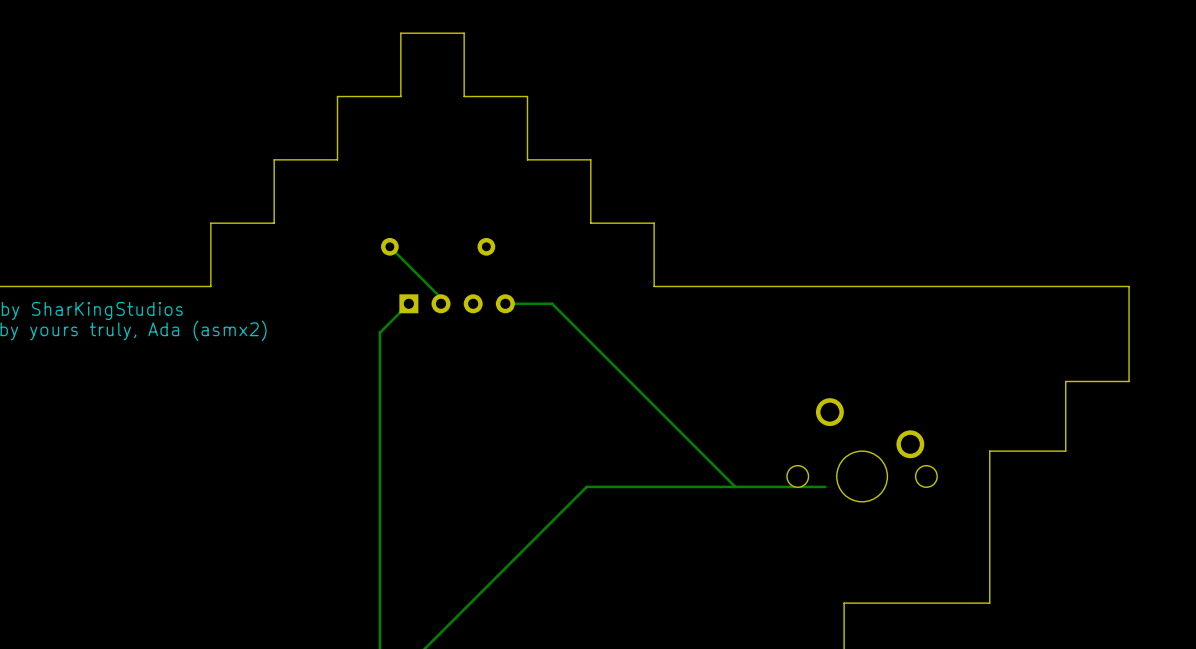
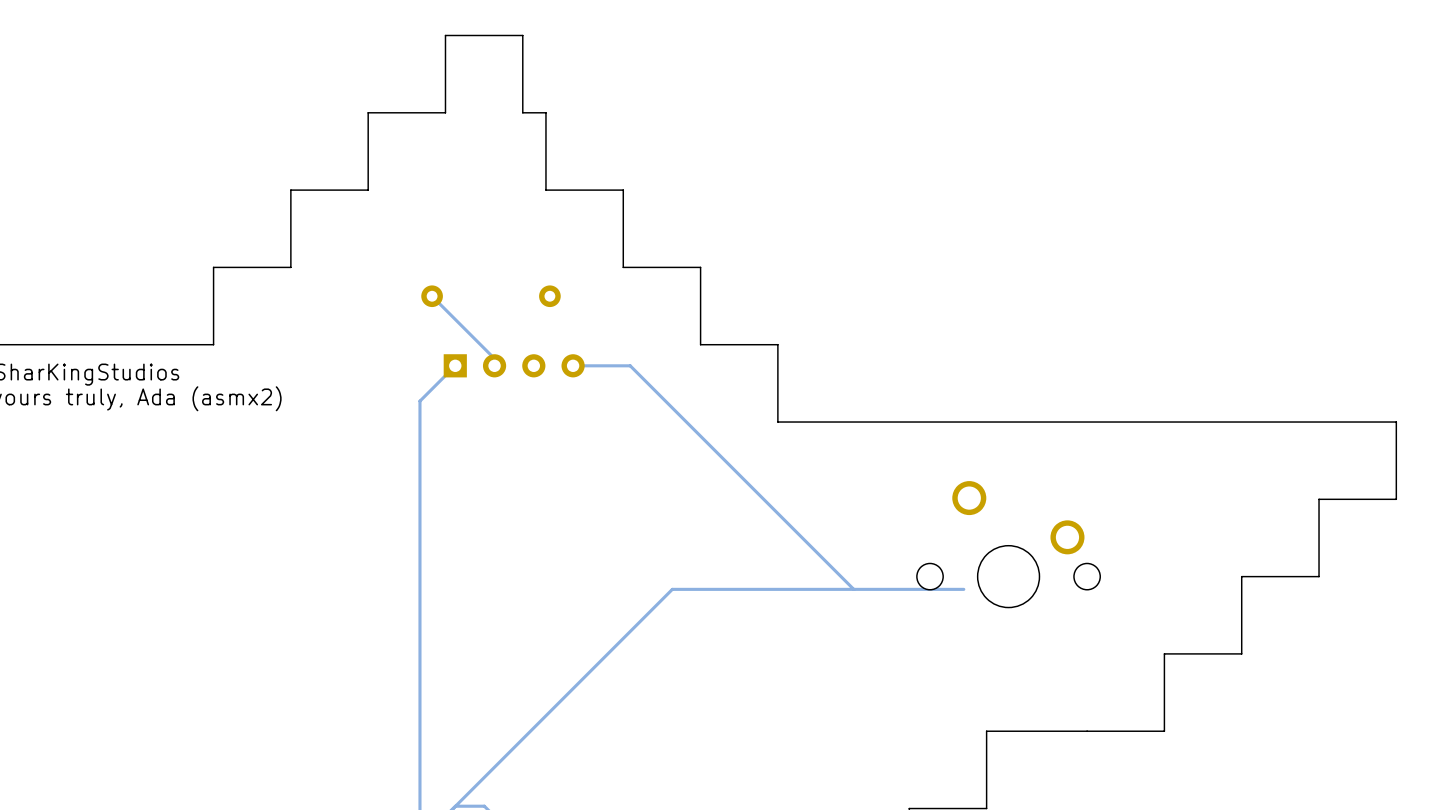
board edge: (483, 96) (527, 96) (527, 159) -> (545, 112) (545, 190) (600, 190)
board edge: (546, 159) (590, 159) (590, 223) -> (623, 190) (623, 267) (677, 267)
board edge: (609, 223) (654, 223) (654, 286) -> (700, 267) (700, 344) (754, 344)
board edge: (673, 286) (1129, 286) (1129, 381) (1065, 381) (1065, 451) (989, 451) (989, 539) -> (777, 344) (777, 422) (1396, 422) (1396, 499) (1319, 499) (1319, 576) (1241, 576) (1241, 653) (1164, 653)

